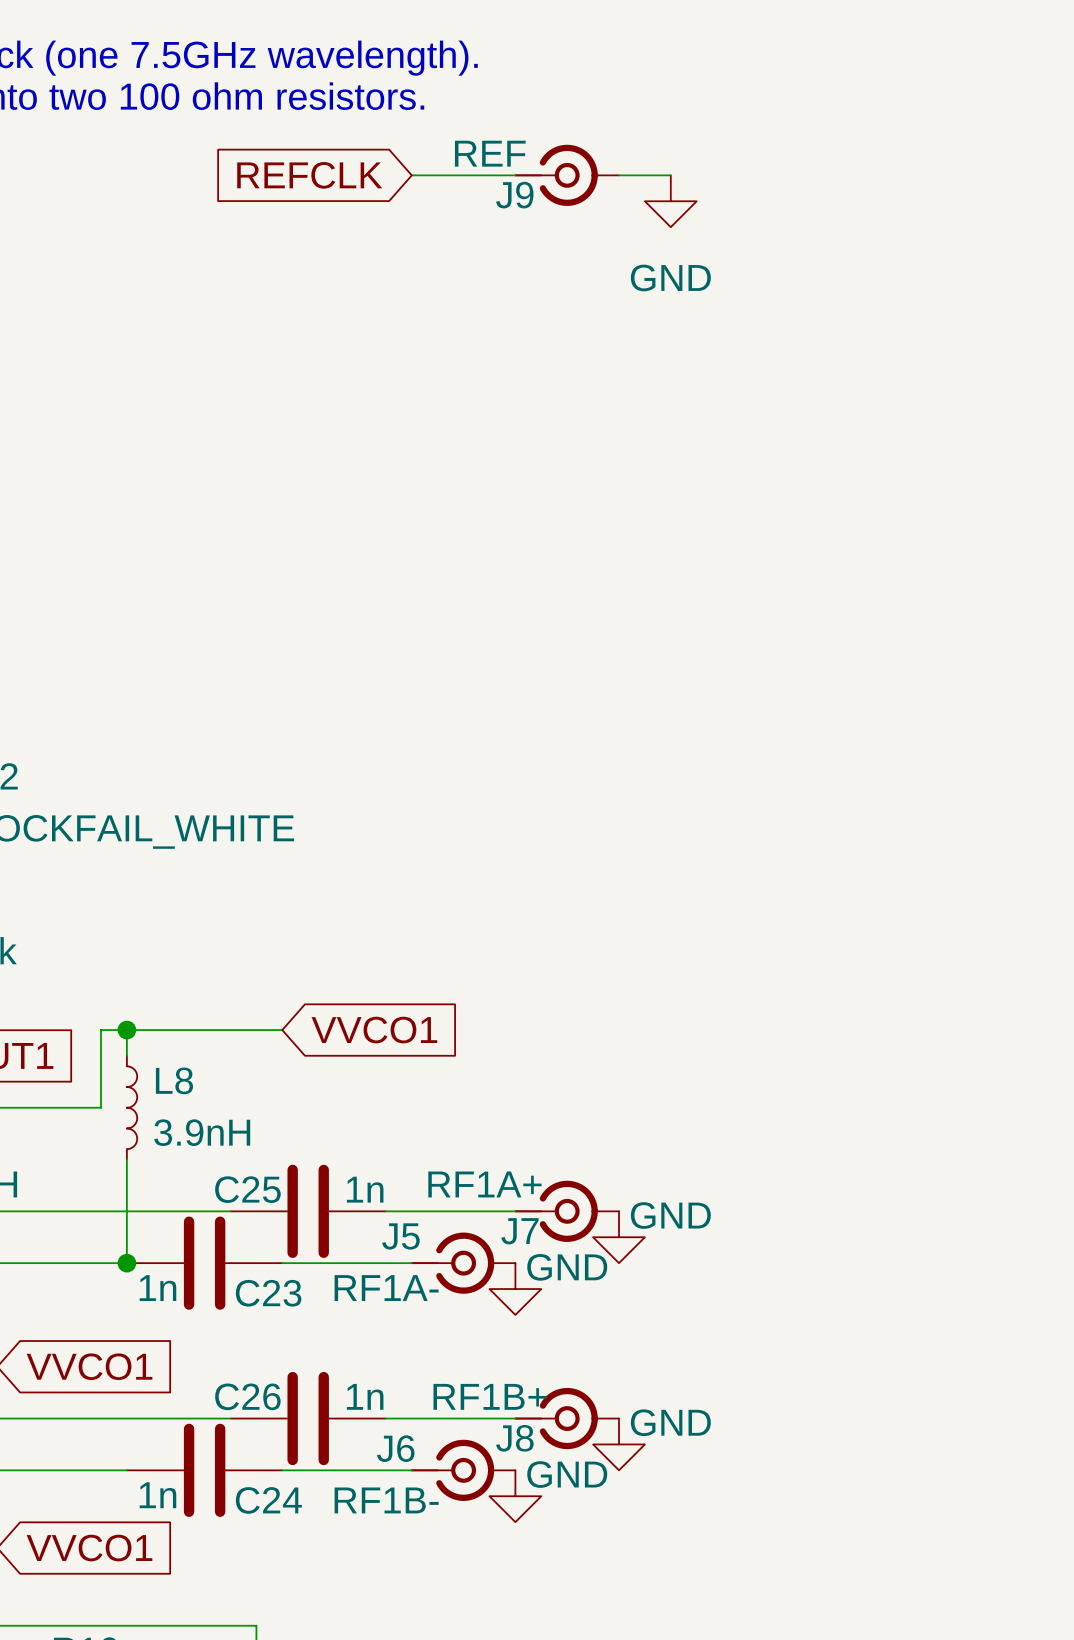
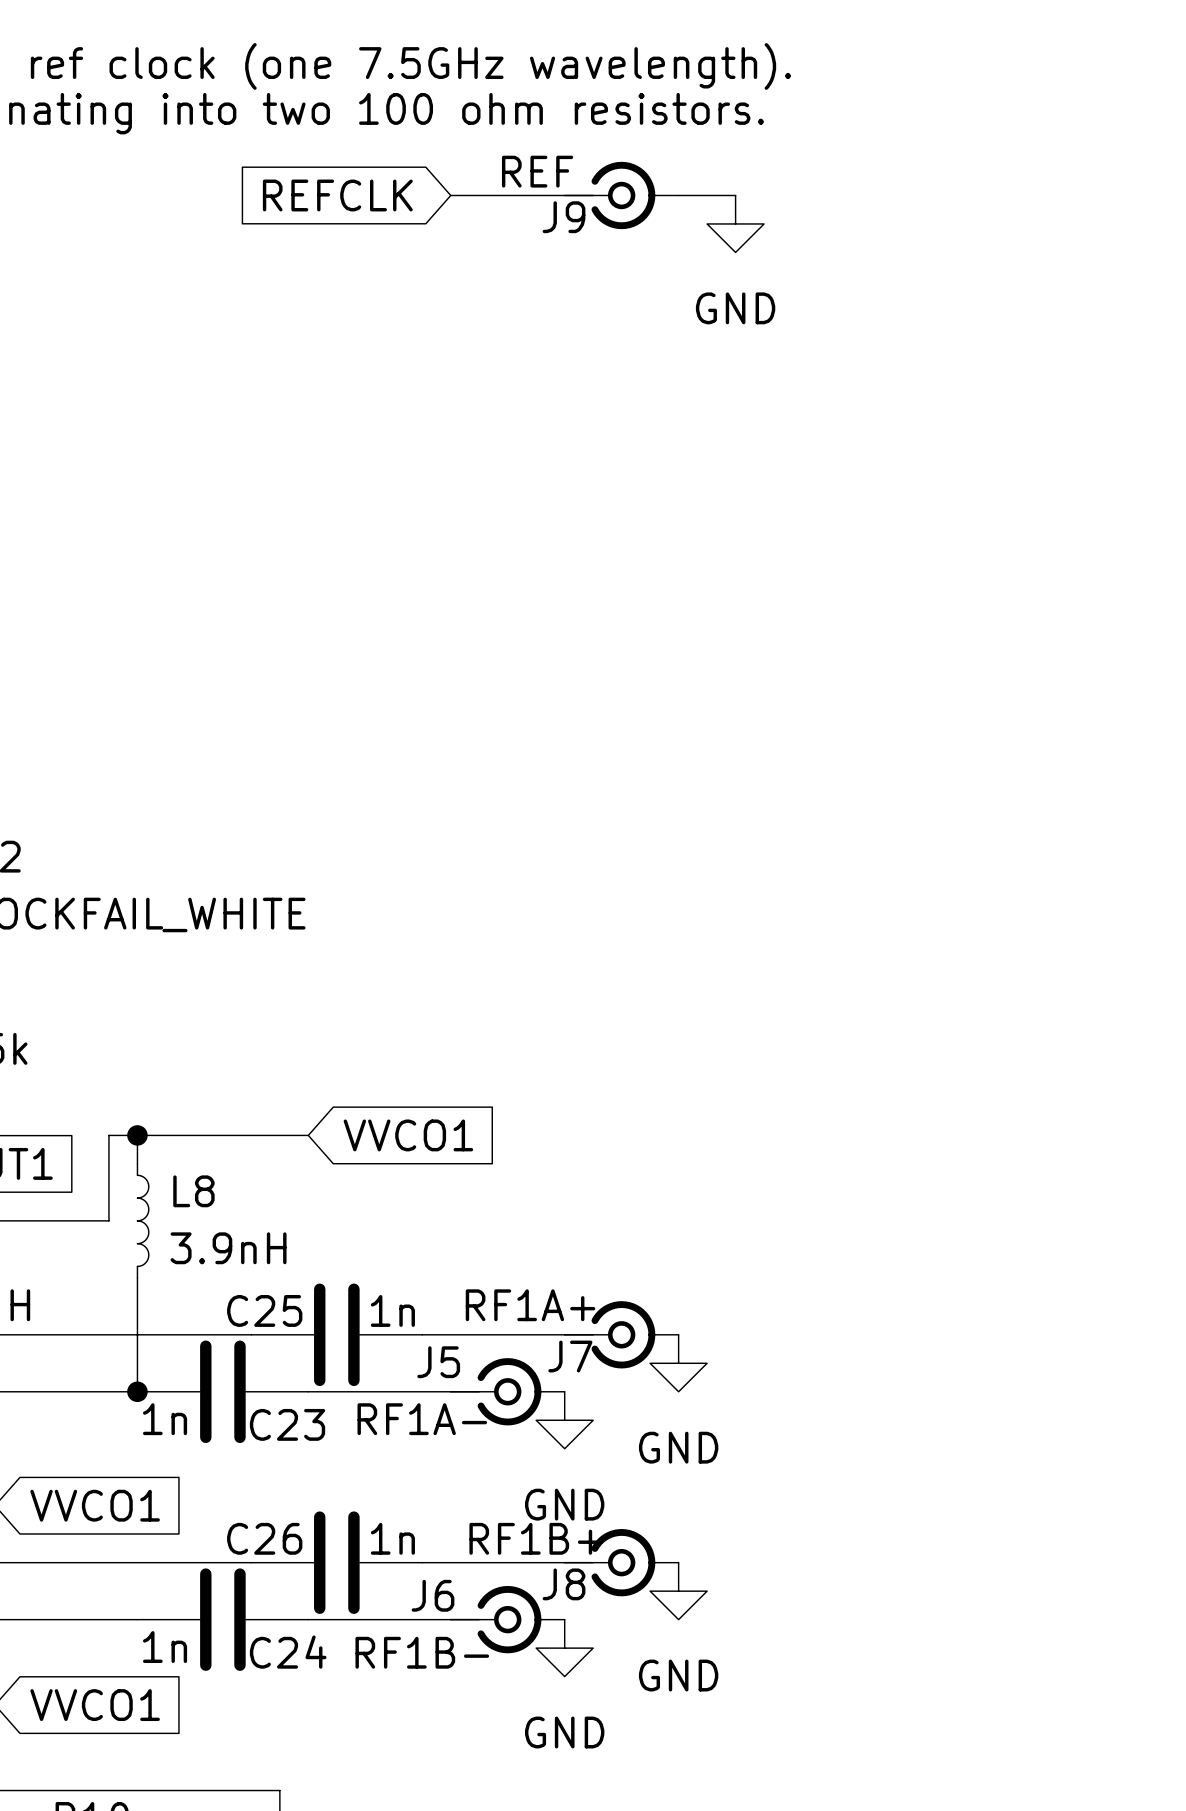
power symbol text position: GND (670, 1215) -> GND (678, 1447)
power symbol text position: GND (567, 1267) -> GND (564, 1504)
power symbol text position: GND (670, 1422) -> GND (678, 1675)
power symbol text position: GND (567, 1474) -> GND (564, 1732)

